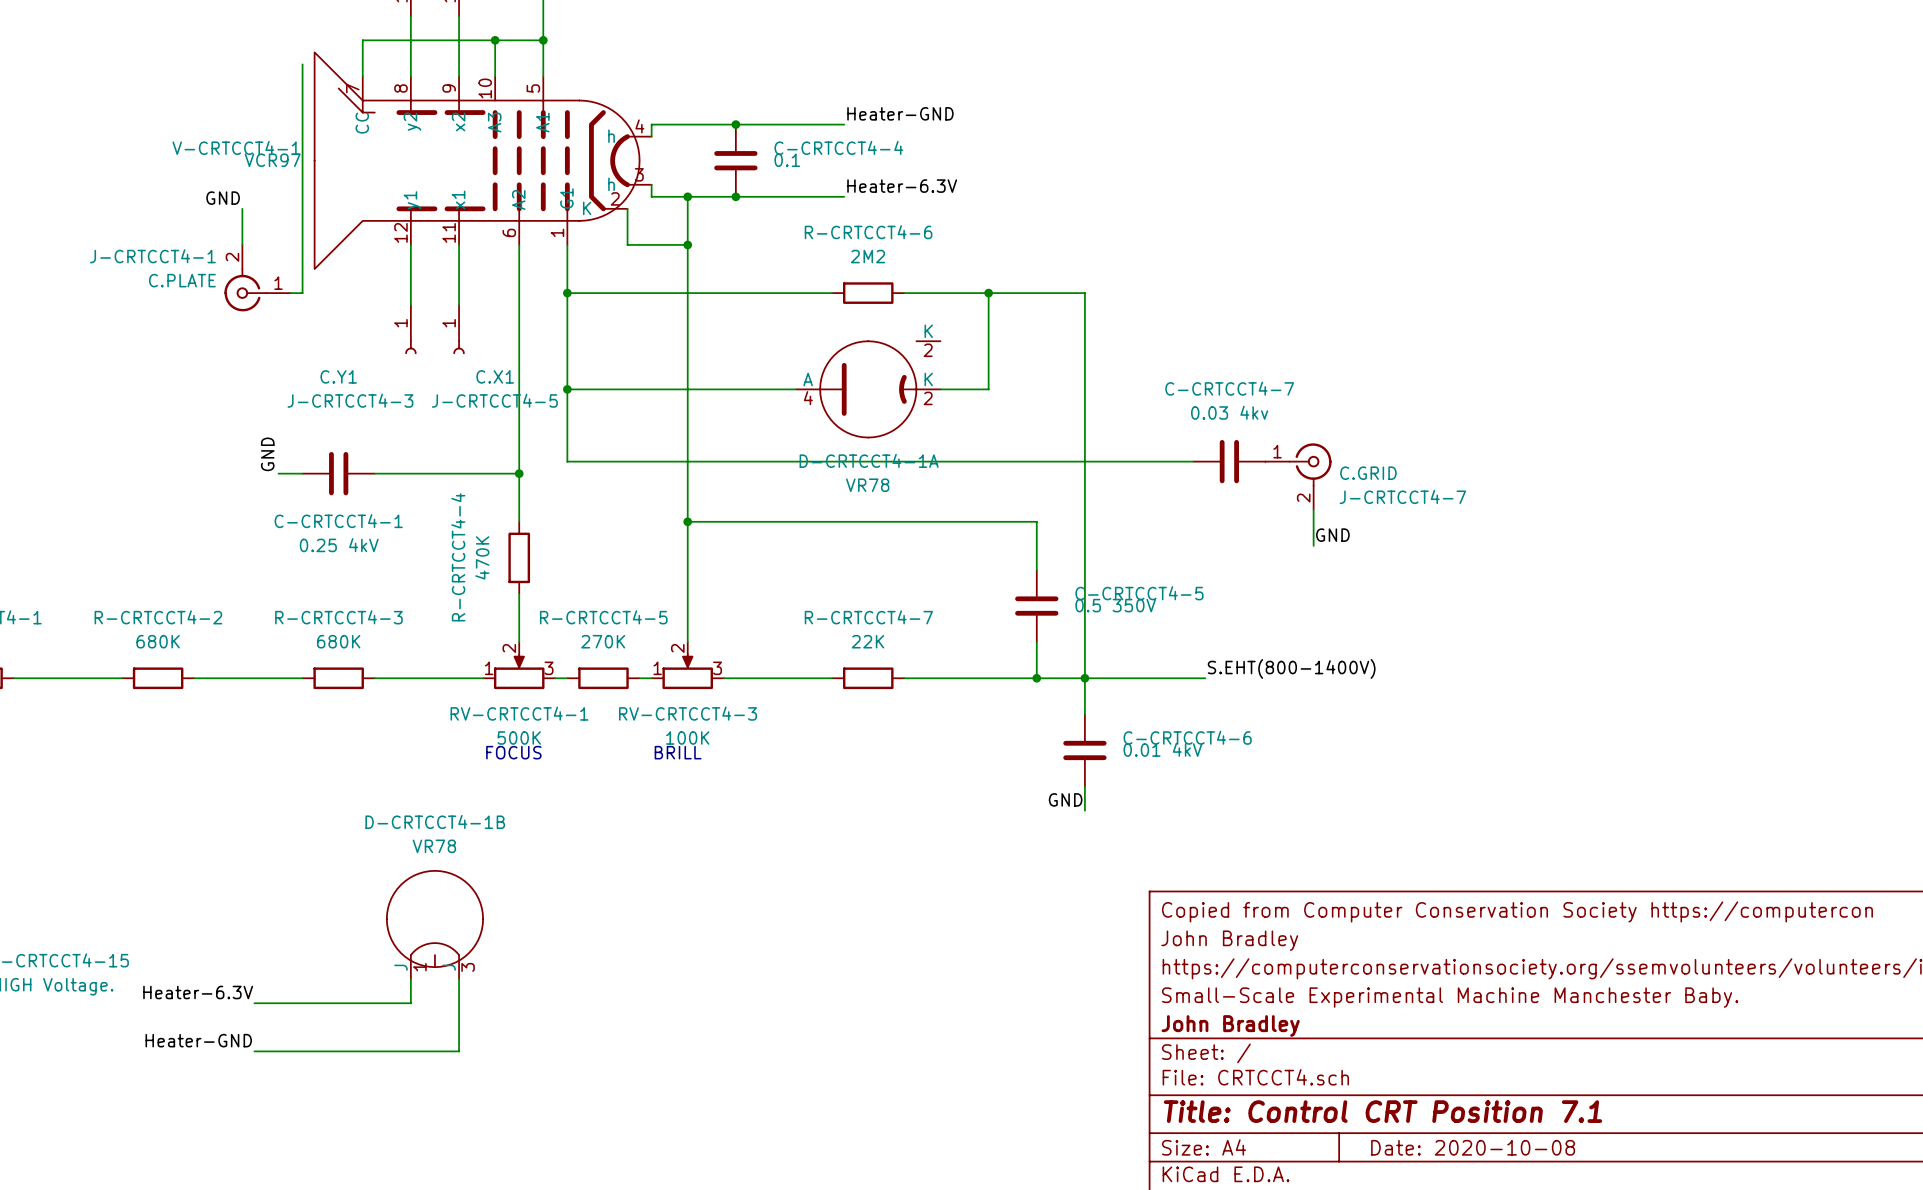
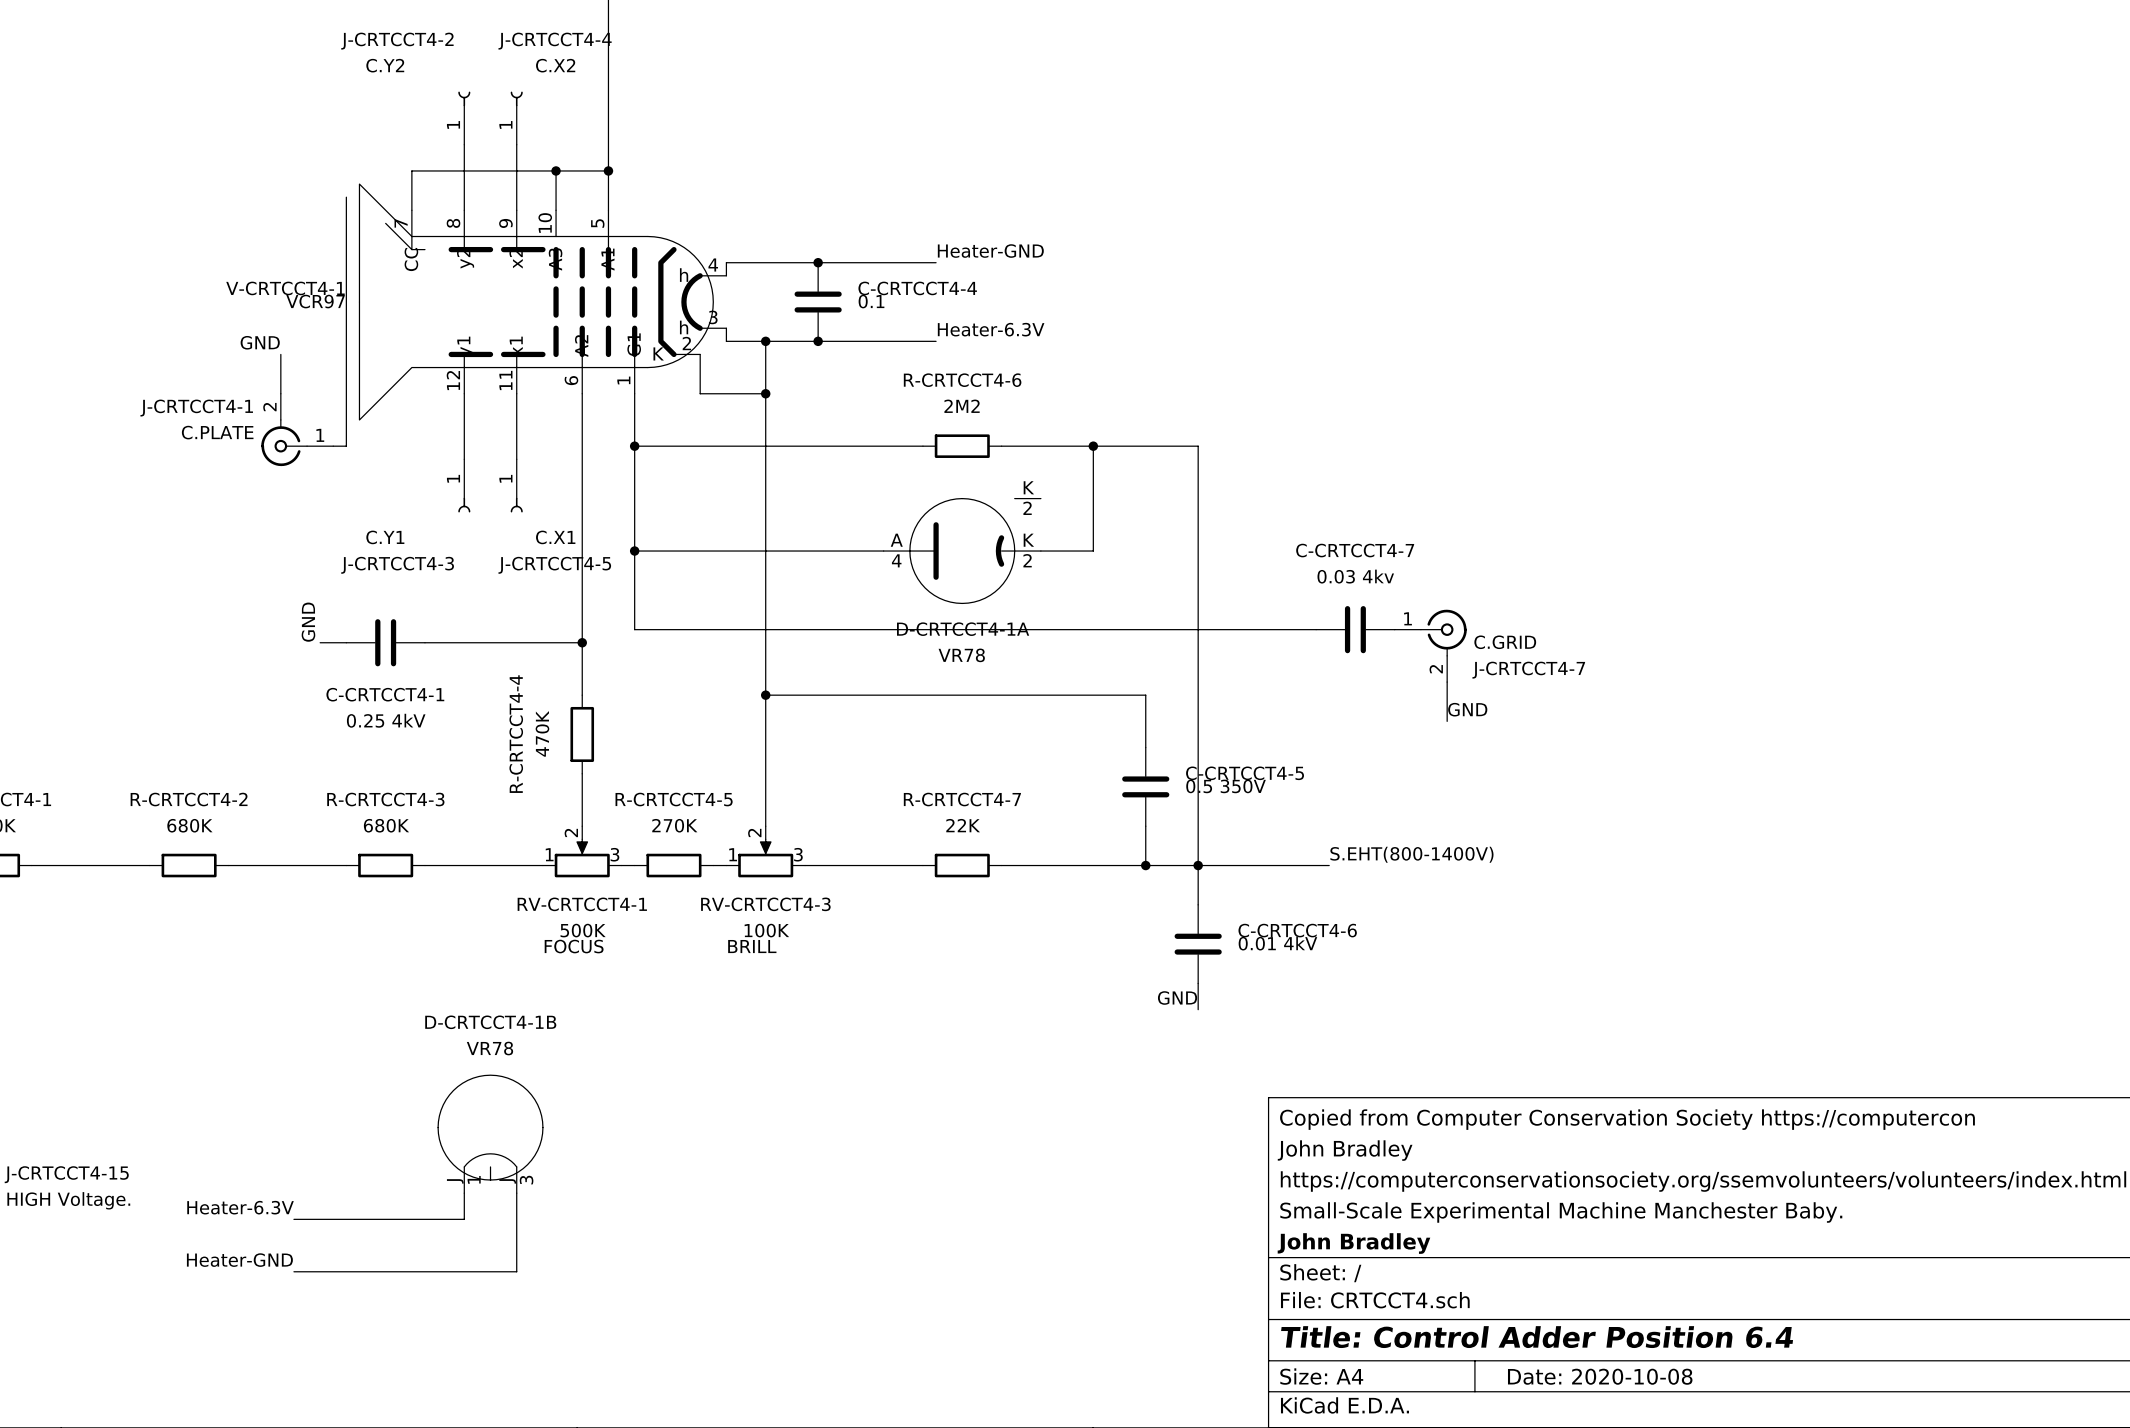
title block: Title: Control CRT Position 7.1 (1382, 1111) -> Title: Control Adder Position 6.4 (1537, 1337)

